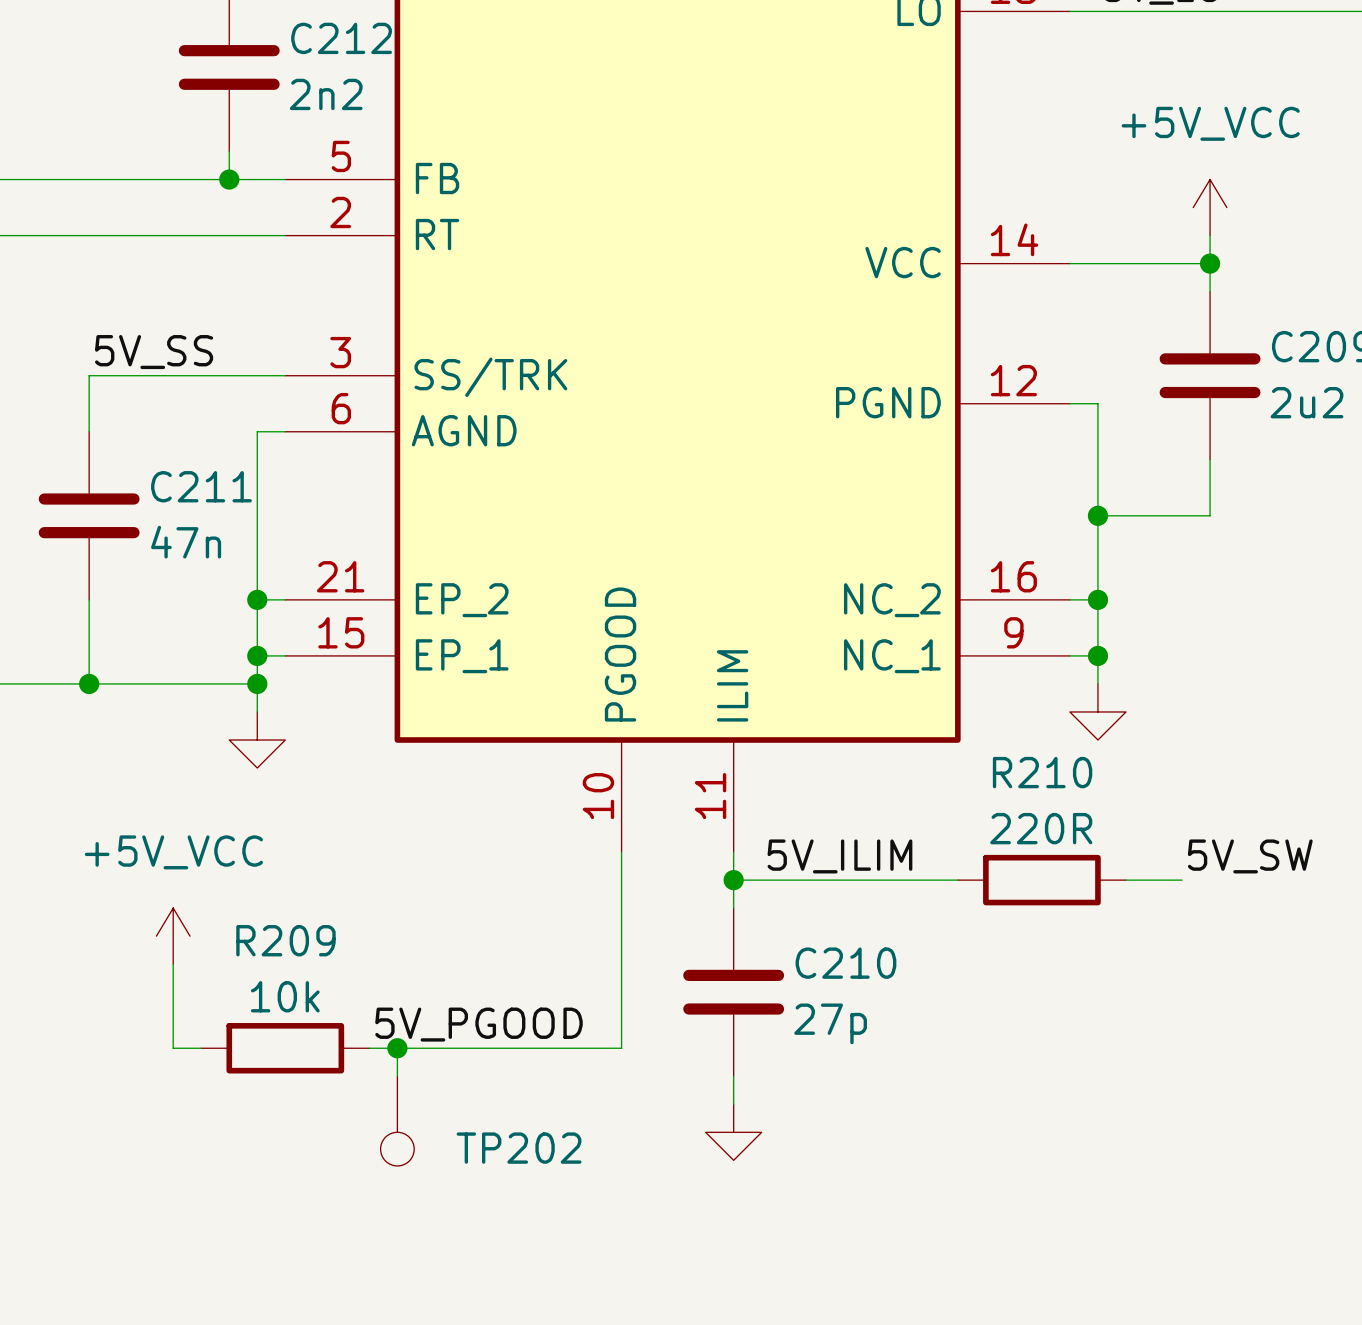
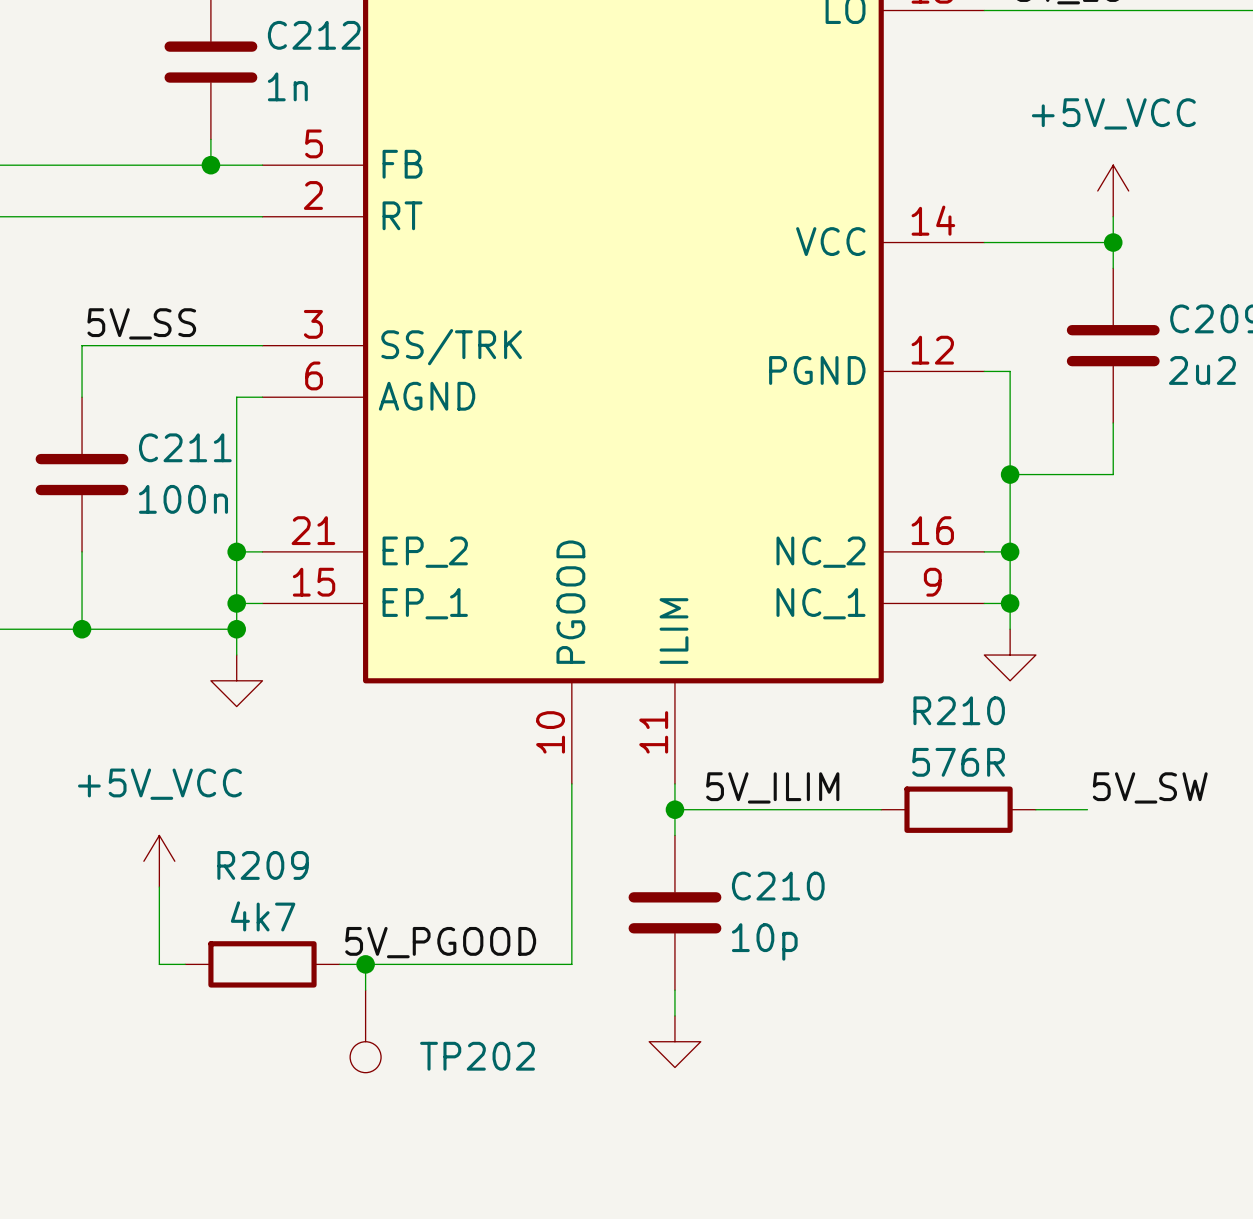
C212 value: 2n2 (326, 94) -> 1n (287, 86)
C211 value: 47n (186, 542) -> 100n (183, 499)
R210 value: 220R (1041, 828) -> 576R (958, 762)
R209 value: 10k (285, 996) -> 4k7 (263, 916)
C210 value: 27p (830, 1023) -> 10p (764, 941)

